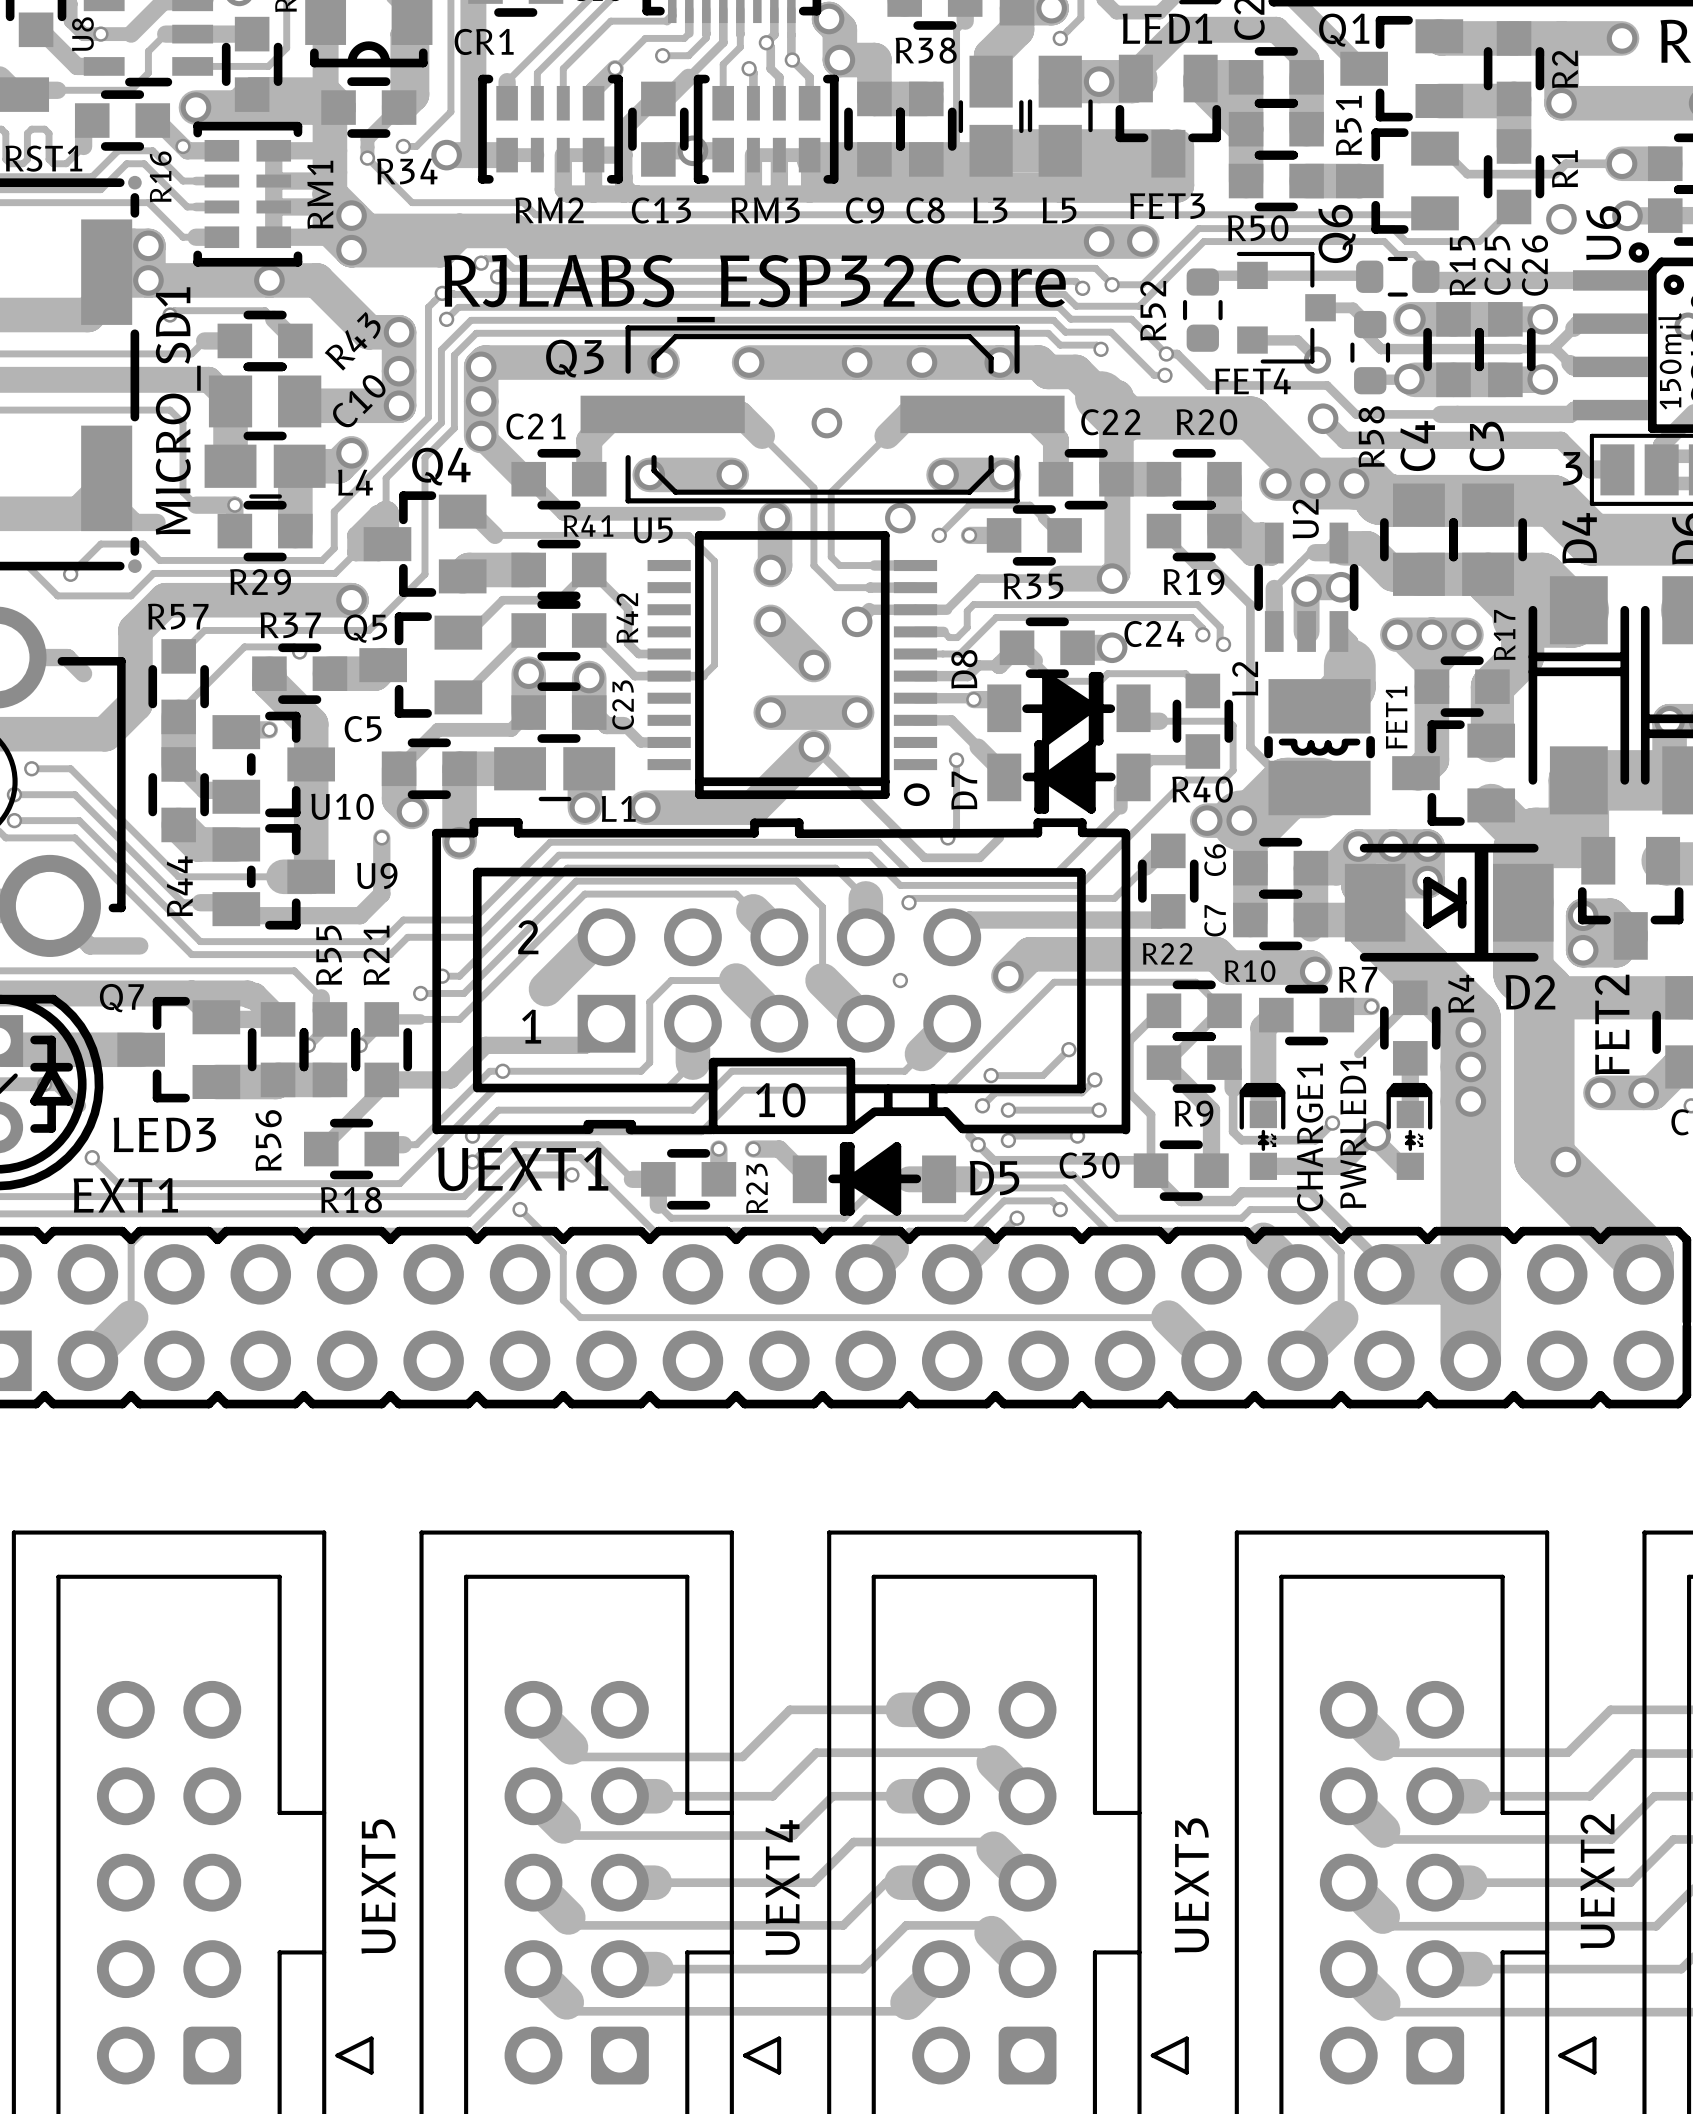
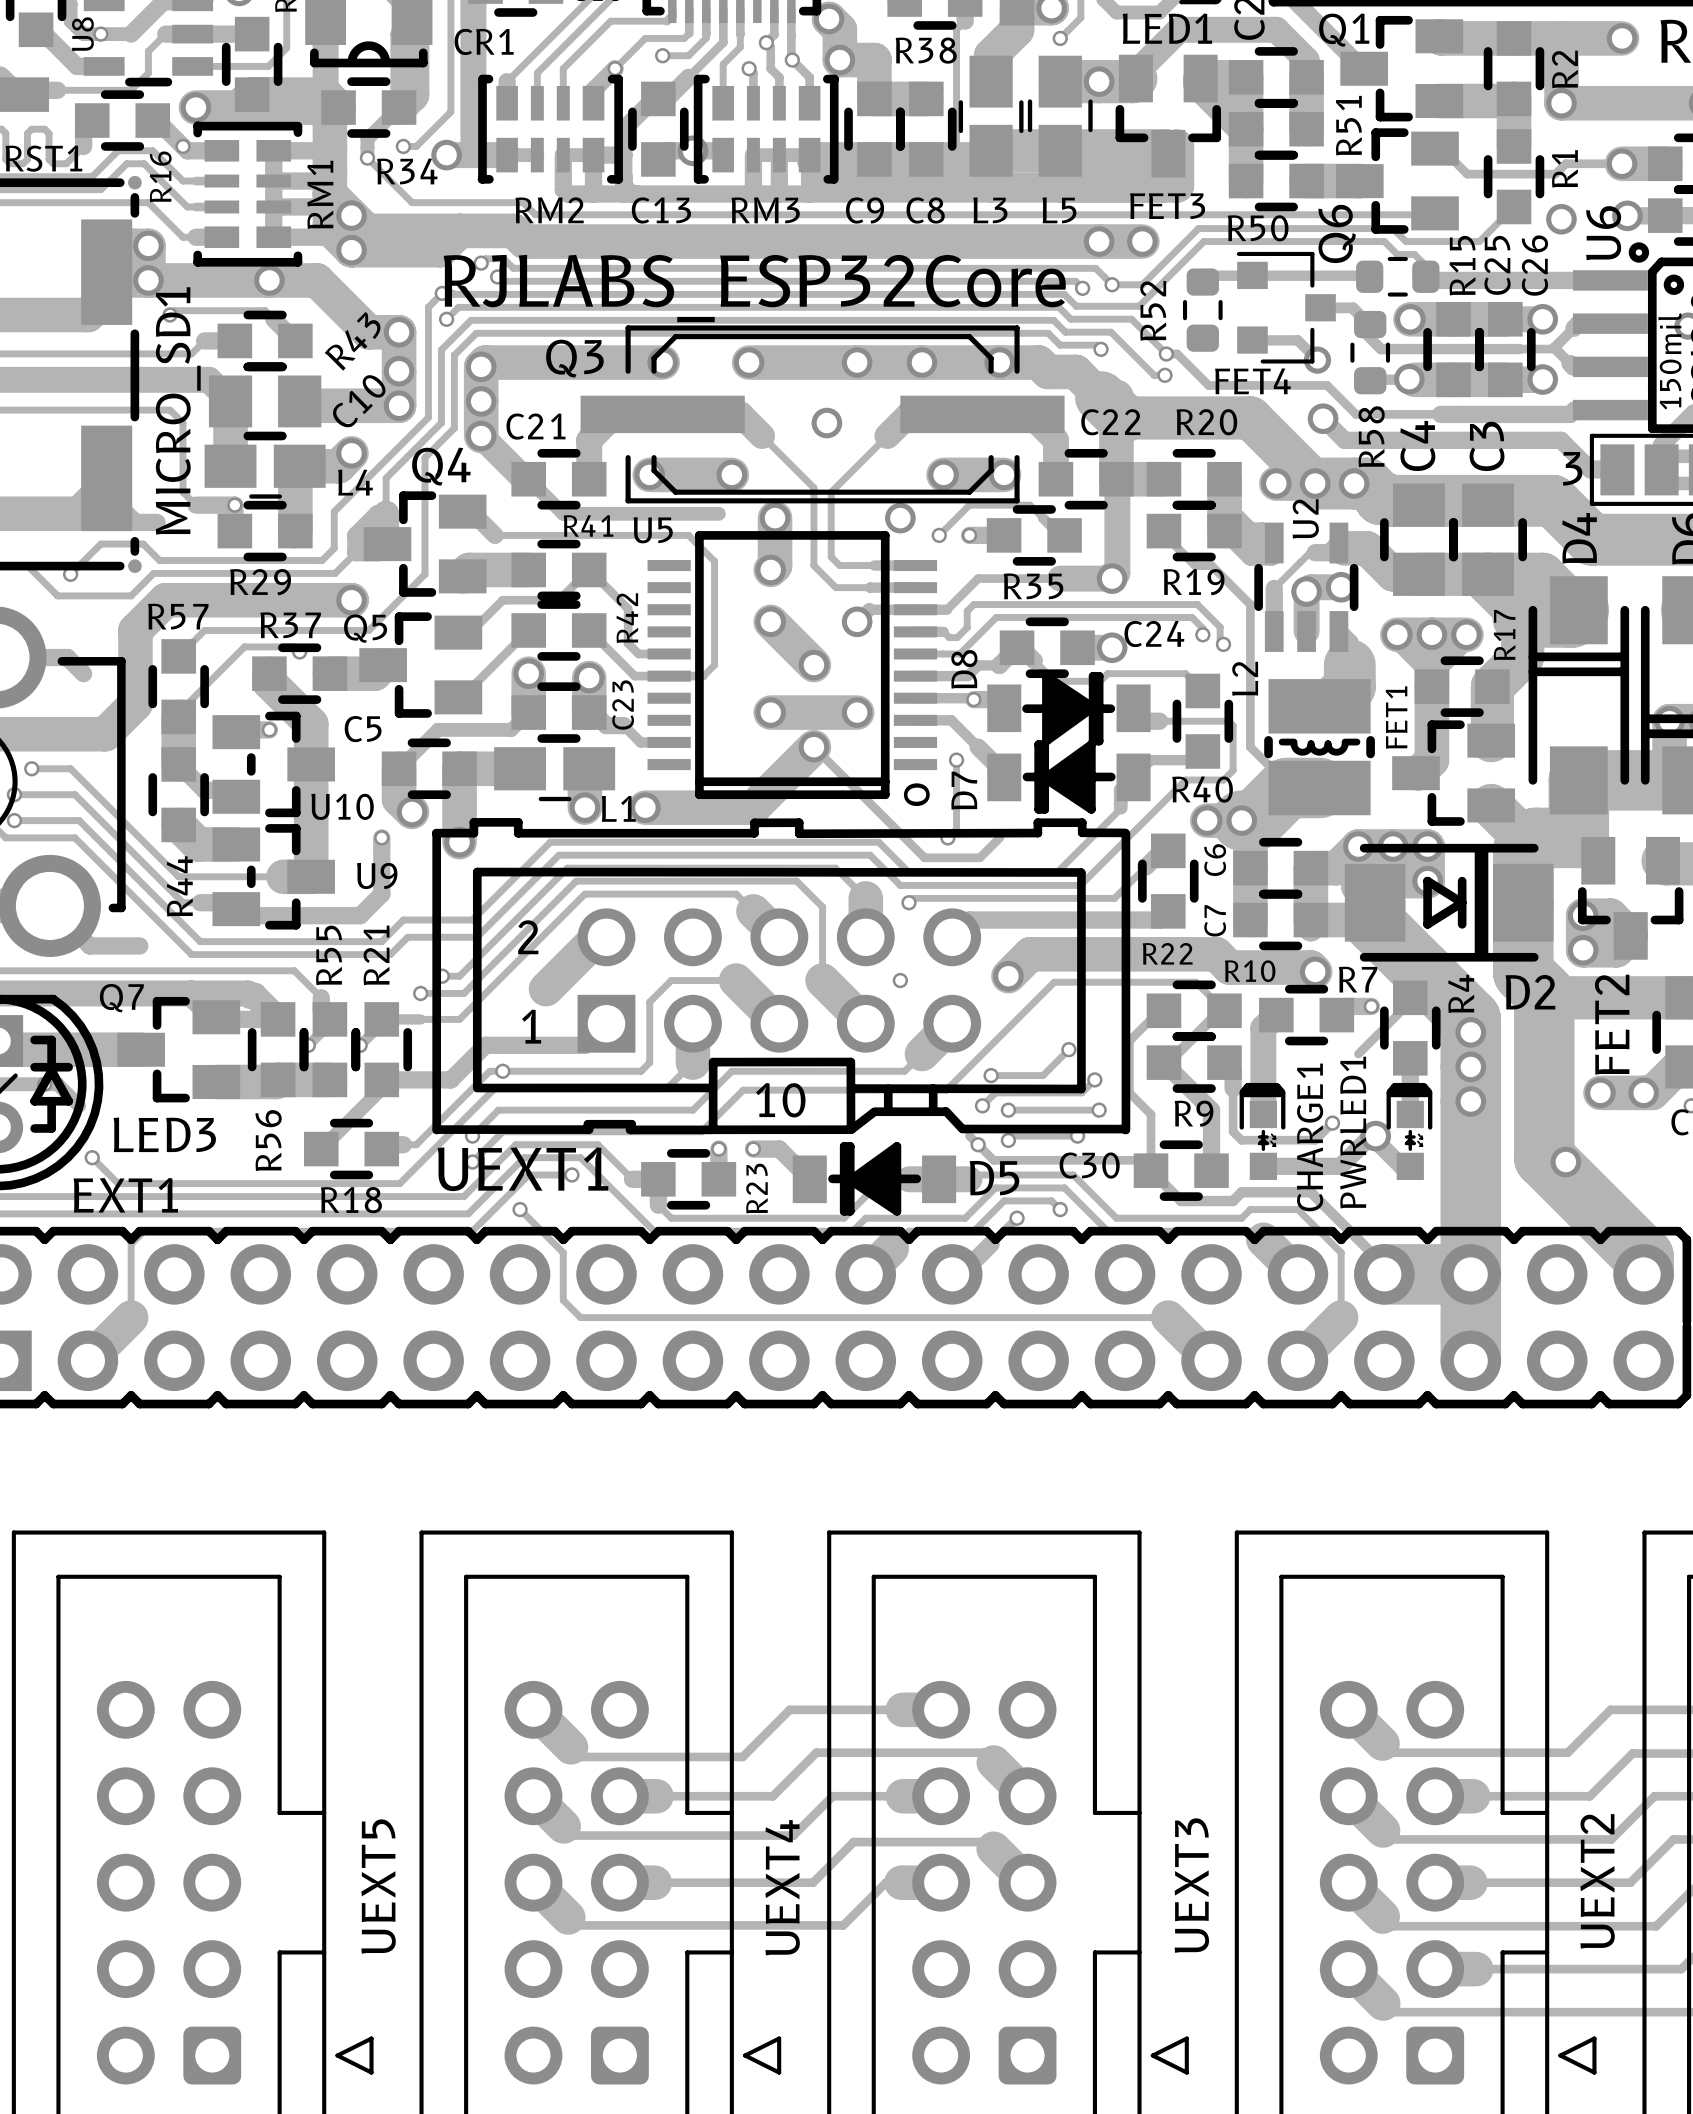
track: (533, 1969) (575, 2011) (898, 2011) (941, 1969) -> none
track: (619, 1969) (862, 1969) (906, 1925) (983, 1925) (1027, 1969) -> none

